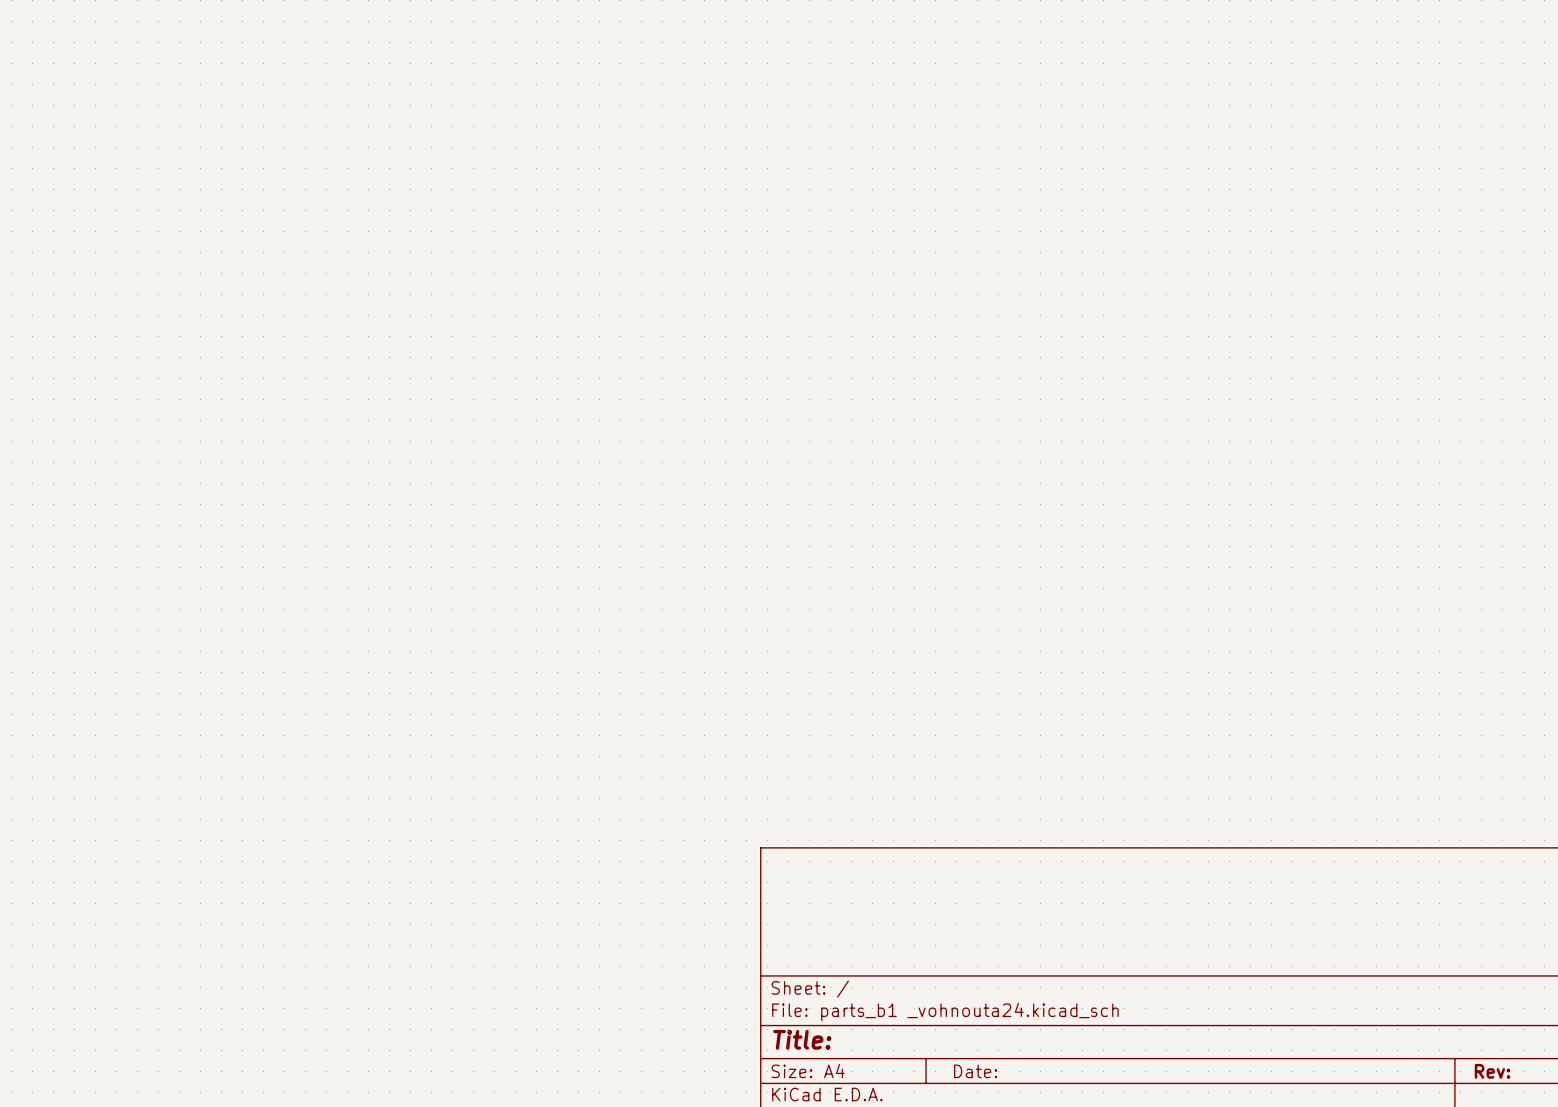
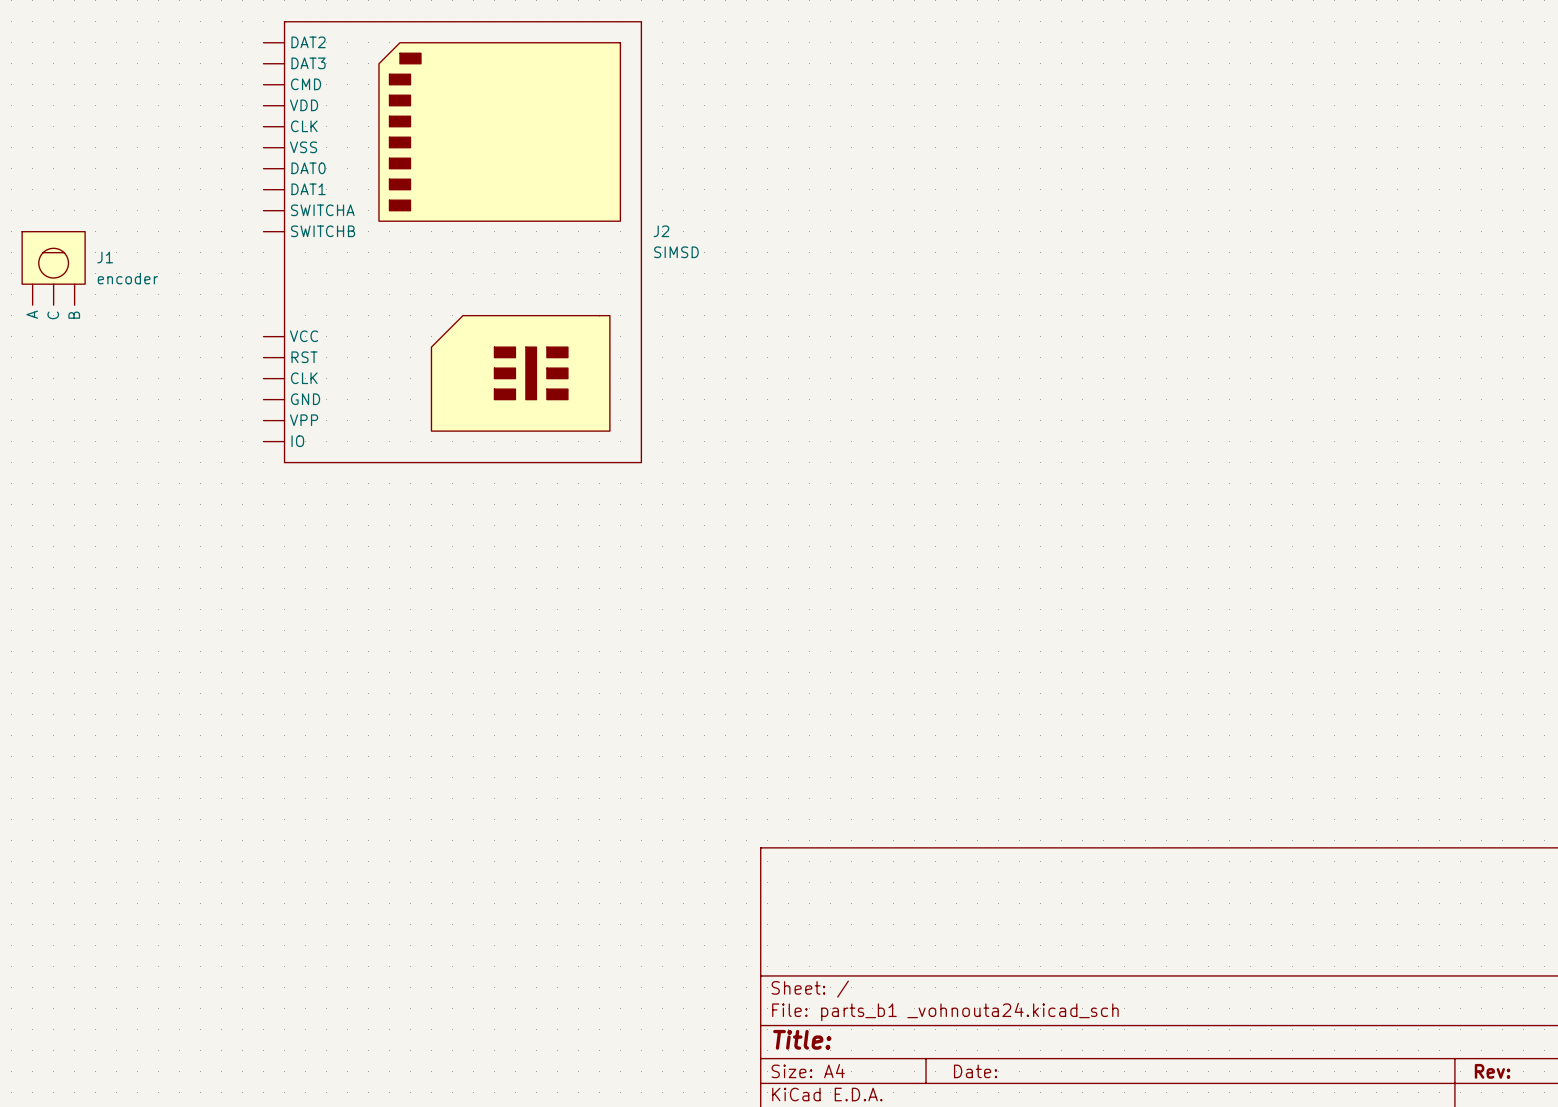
J2: none -> SIMSD (452, 242)
J1: none -> encoder (53, 268)

